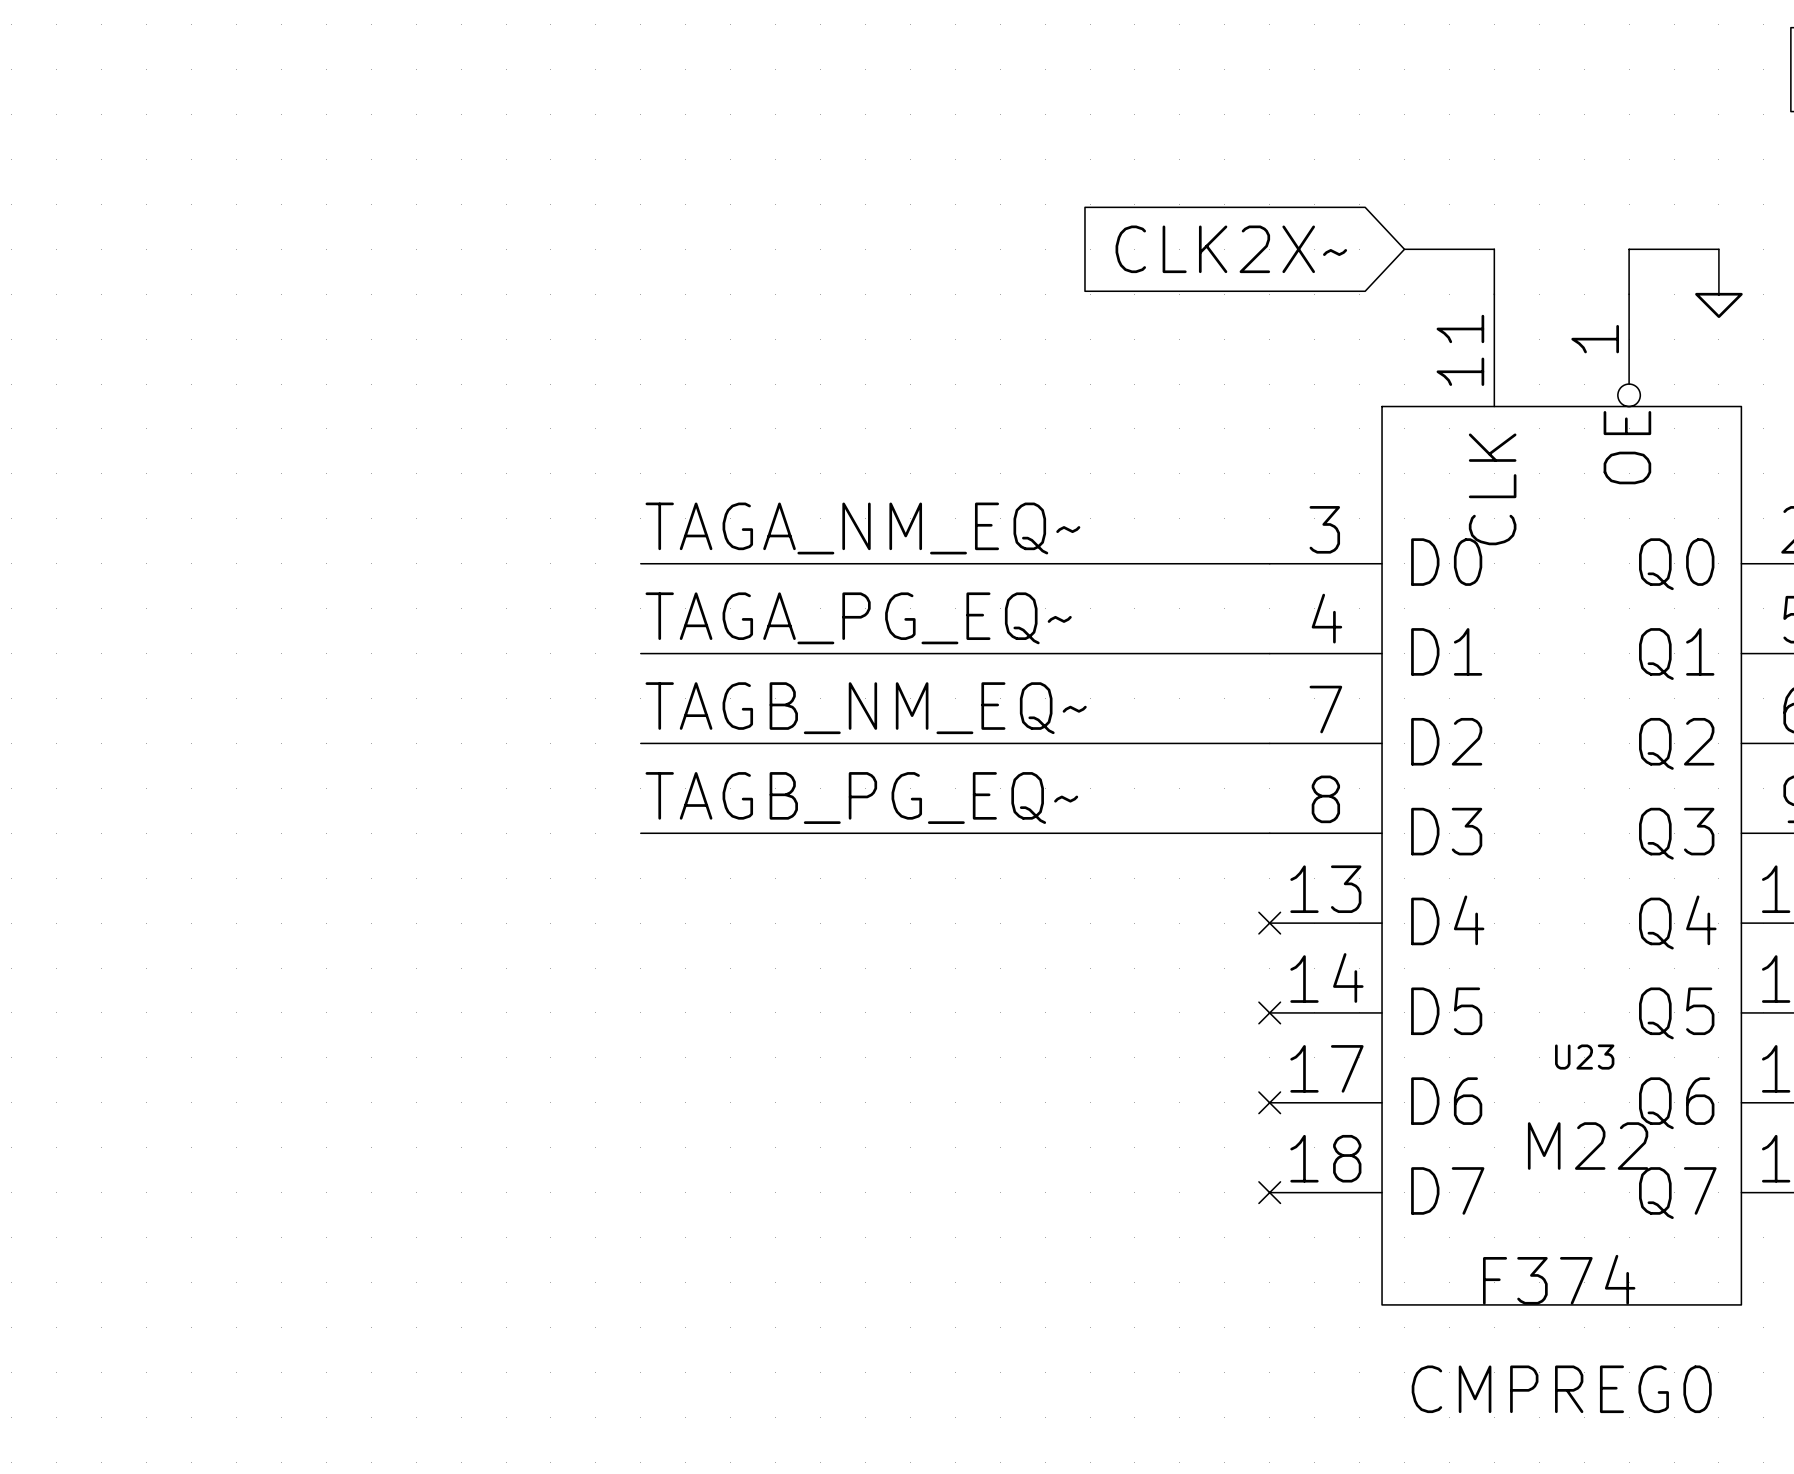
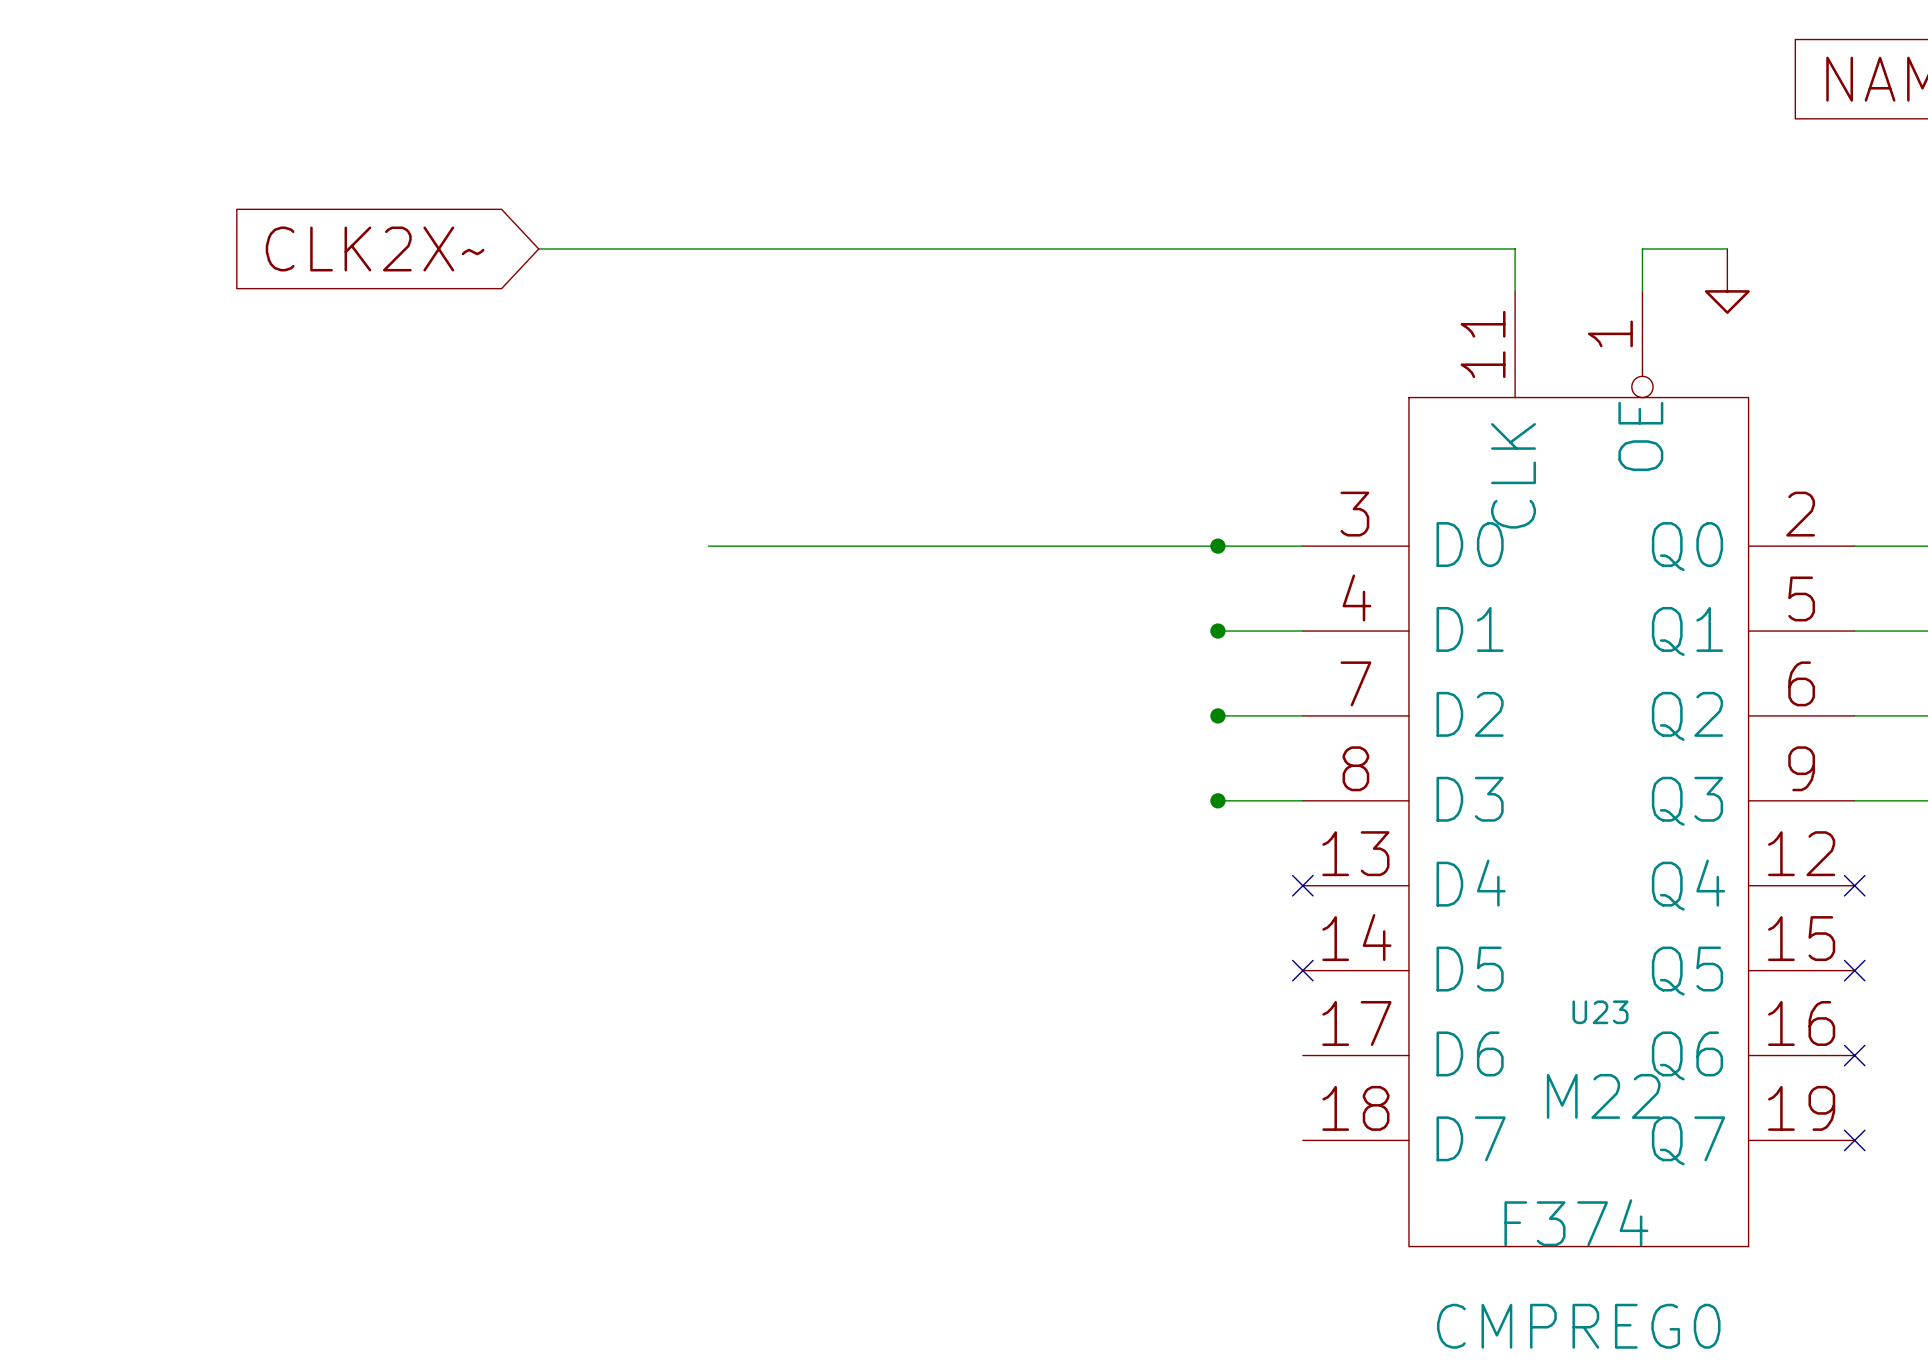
global label: none -> CLK2X~ (375, 248)
wire: none -> (538, 248) (1430, 248)
global label: CLK2X~ (1231, 249) -> none
label: TAGA_NM_EQ~ (862, 528) -> none
junction: none -> (1217, 546)
label: TAGA_PG_EQ~ (858, 618) -> none
wire: (640, 653) (1179, 653) -> none
junction: none -> (1217, 631)
label: TAGB_NM_EQ~ (866, 708) -> none
wire: (640, 743) (1179, 743) -> none
junction: none -> (1217, 715)
label: TAGB_PG_EQ~ (861, 798) -> none
wire: (640, 833) (1179, 833) -> none
junction: none -> (1217, 800)
no-connect mark: (1269, 1102) -> none
no-connect mark: (1269, 1192) -> none

